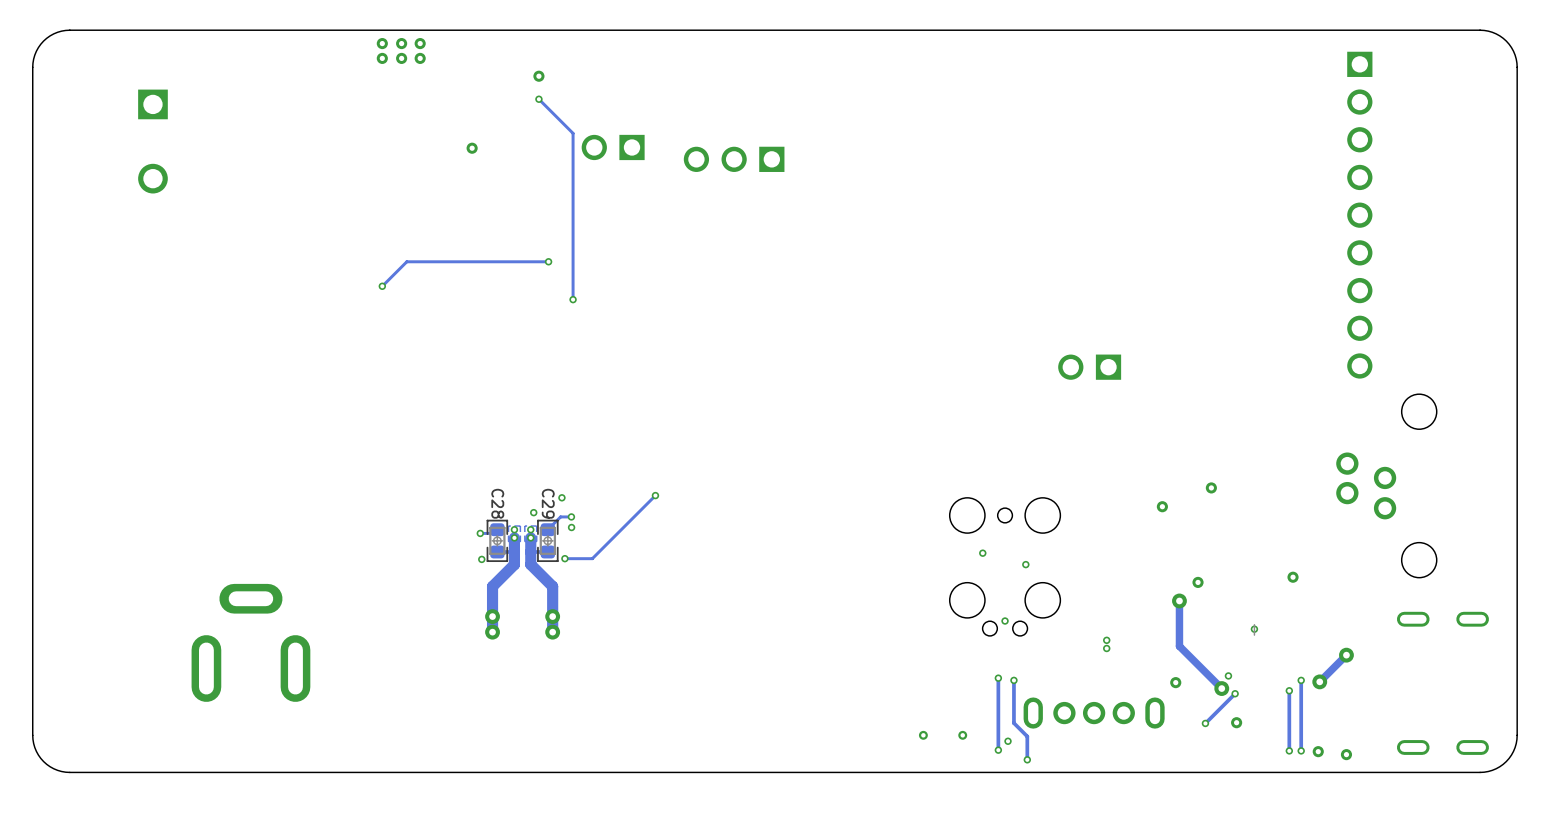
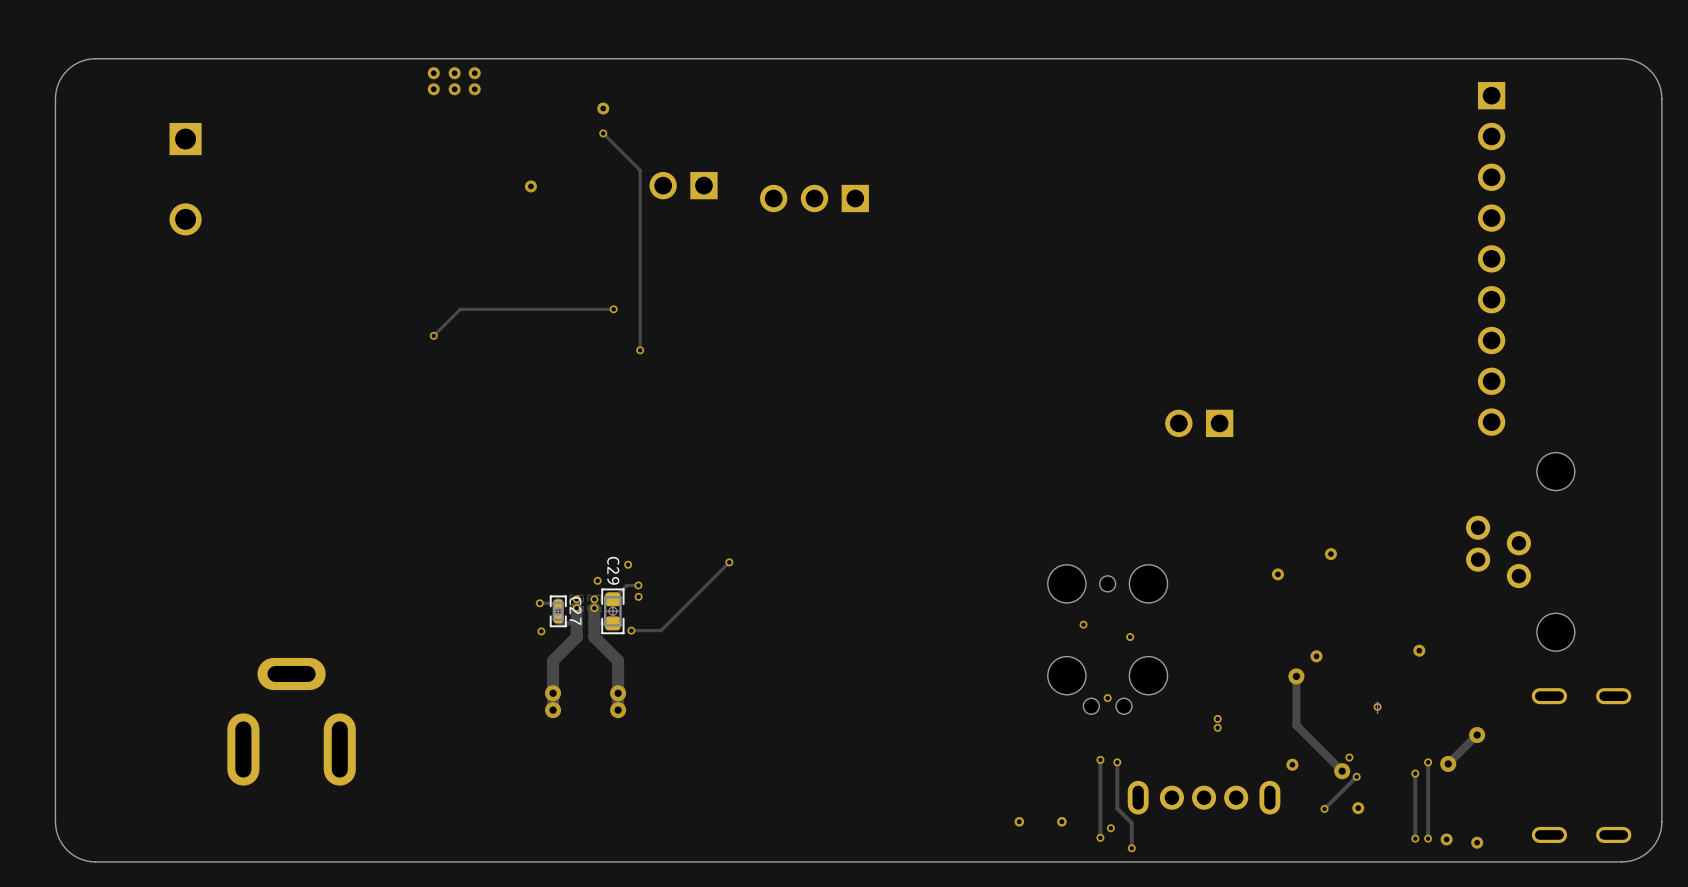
C28: (497, 540) -> none
C27: none -> (558, 611)

